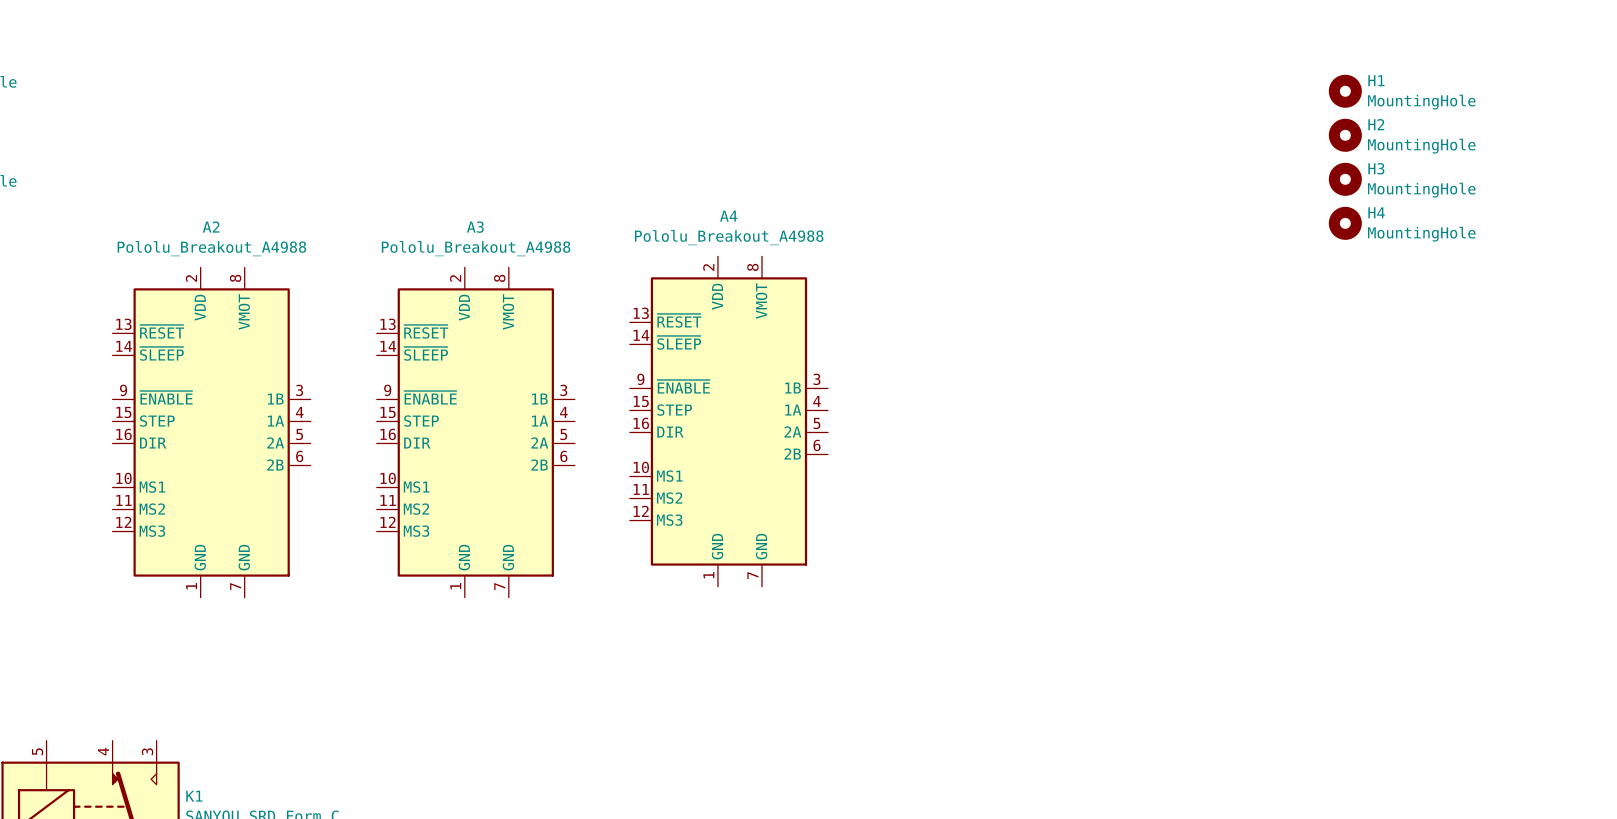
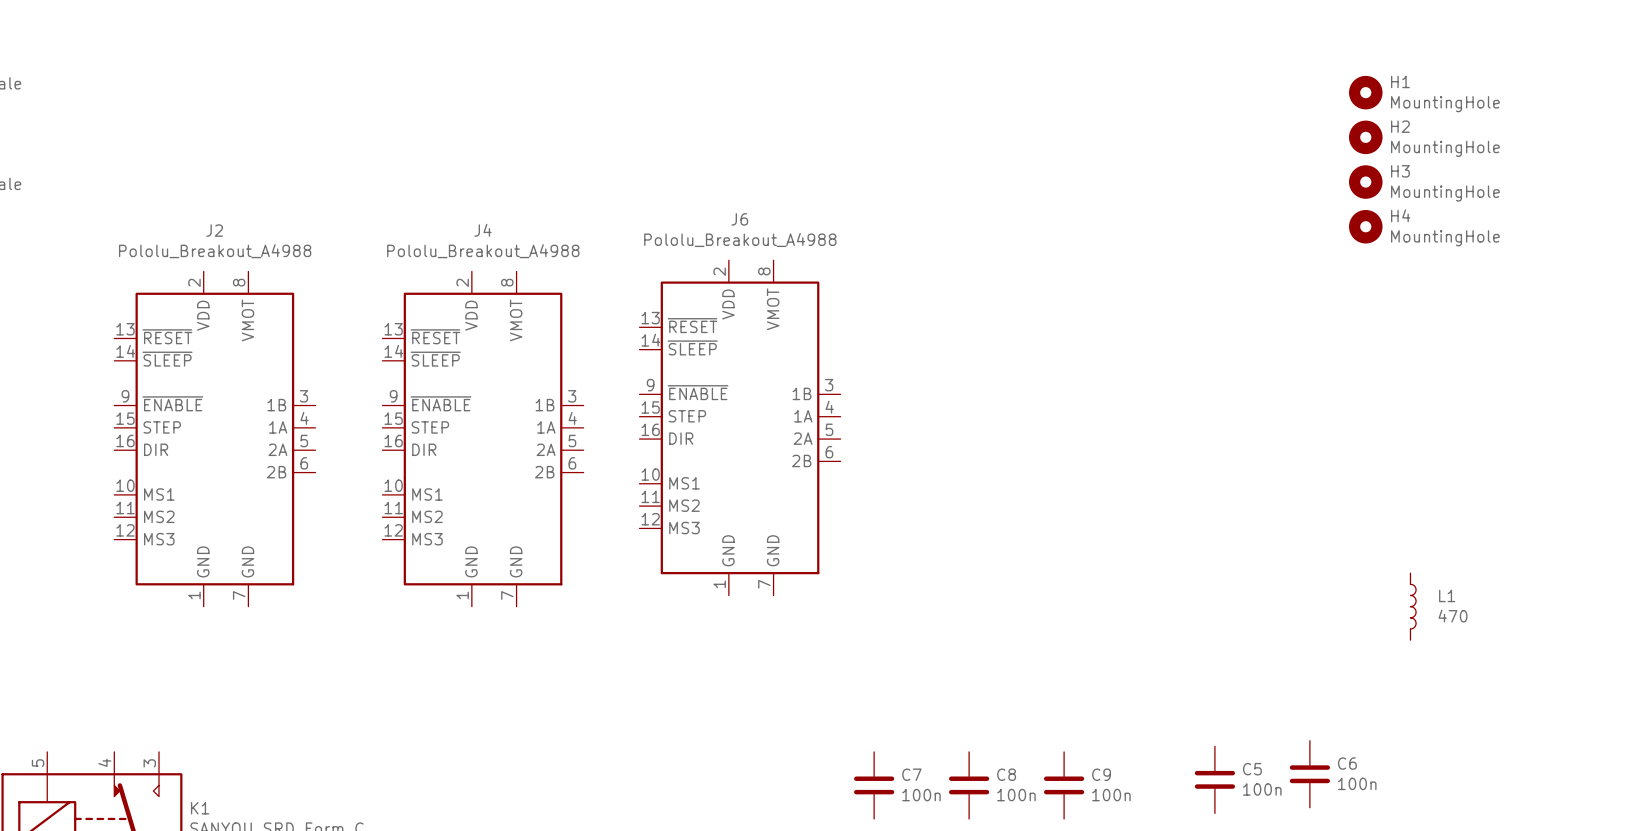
A4 name: A4 (728, 216) -> J6 (739, 219)
A2 name: A2 (211, 227) -> J2 (214, 230)
A3 name: A3 (475, 227) -> J4 (483, 230)
L1: none -> 470 (1413, 606)
C6: none -> 100n (1309, 774)
C5: none -> 100n (1214, 779)
C7: none -> 100n (874, 785)
C8: none -> 100n (969, 785)
C9: none -> 100n (1064, 785)

